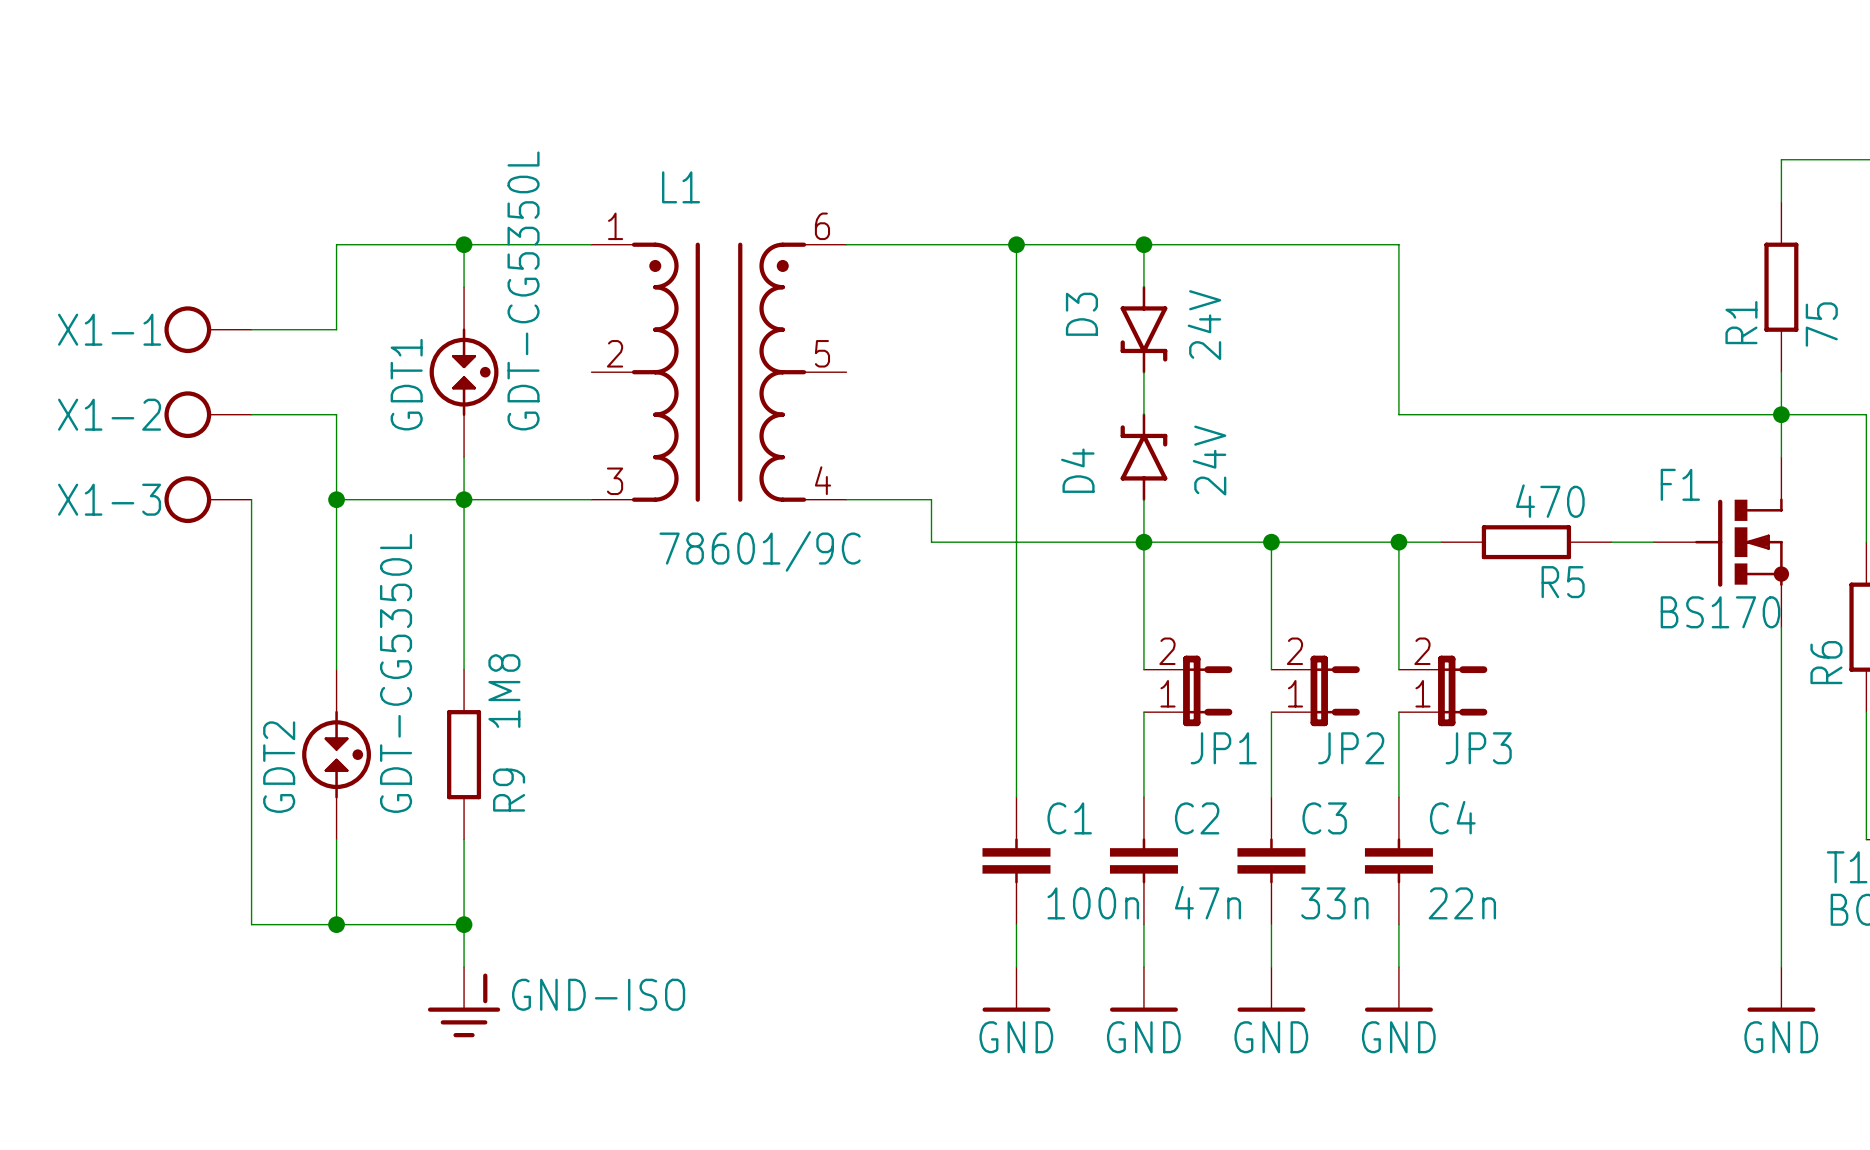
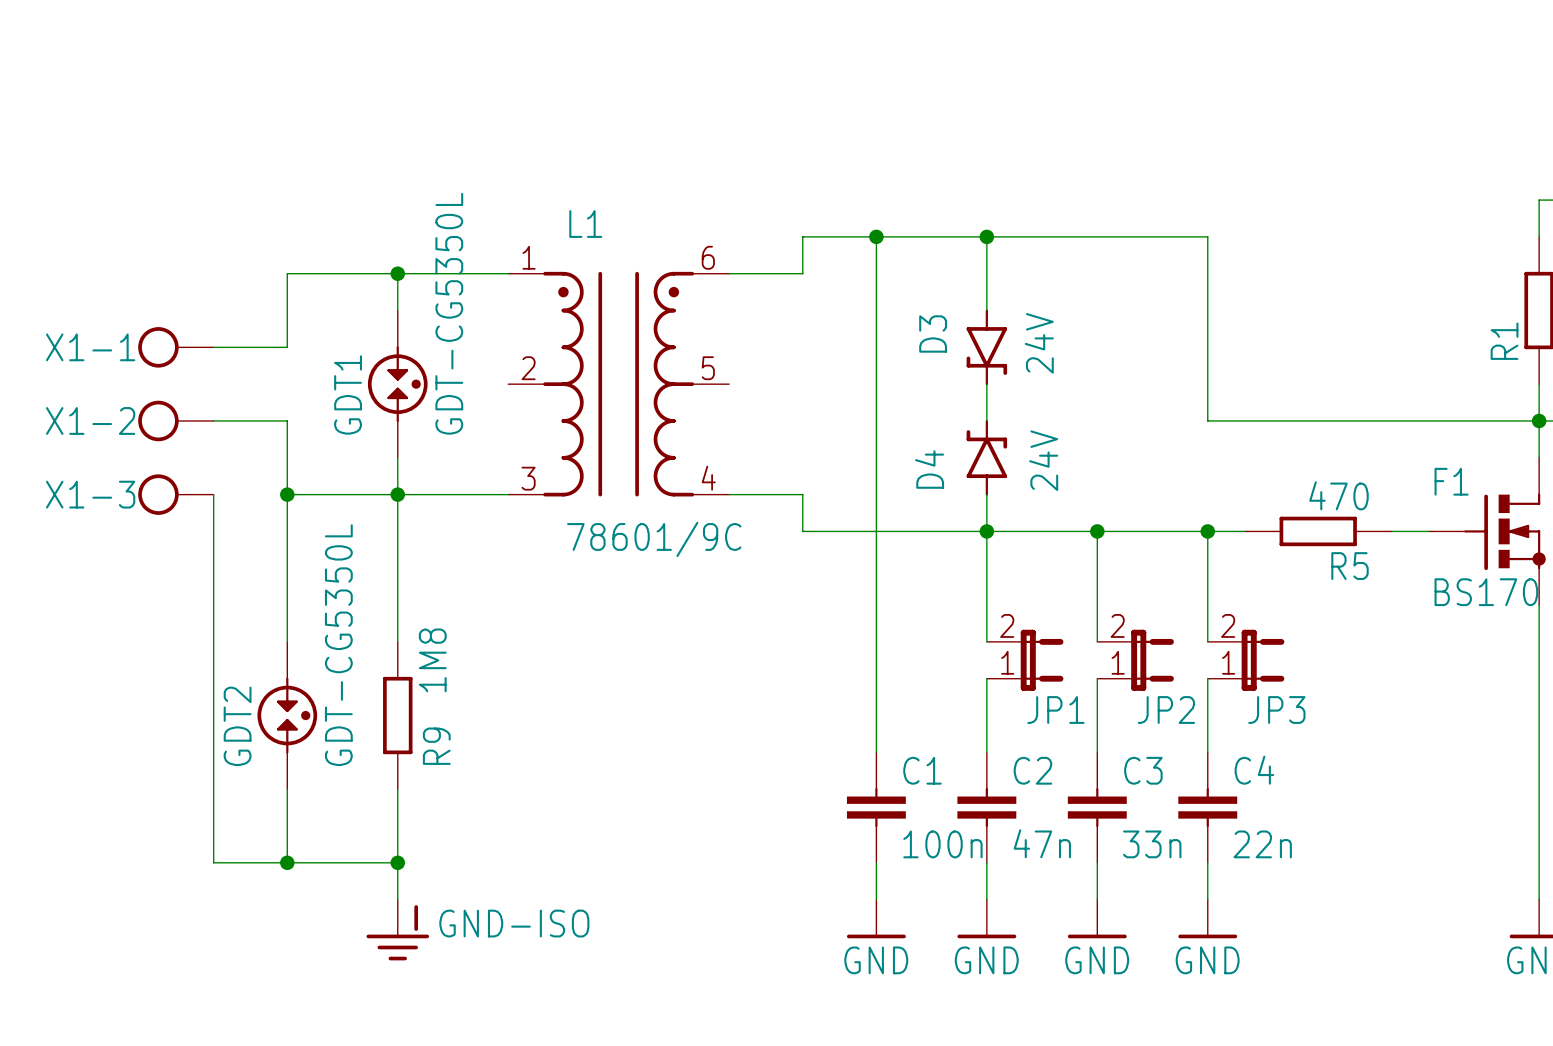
wire: none -> (876, 236) (876, 273)
wire: none -> (986, 236) (986, 273)
wire: (931, 244) (1398, 244) -> (802, 273) (802, 236) (1207, 236) (1207, 273)
junction position: (1016, 244) -> (876, 236)
junction position: (1143, 244) -> (986, 236)

